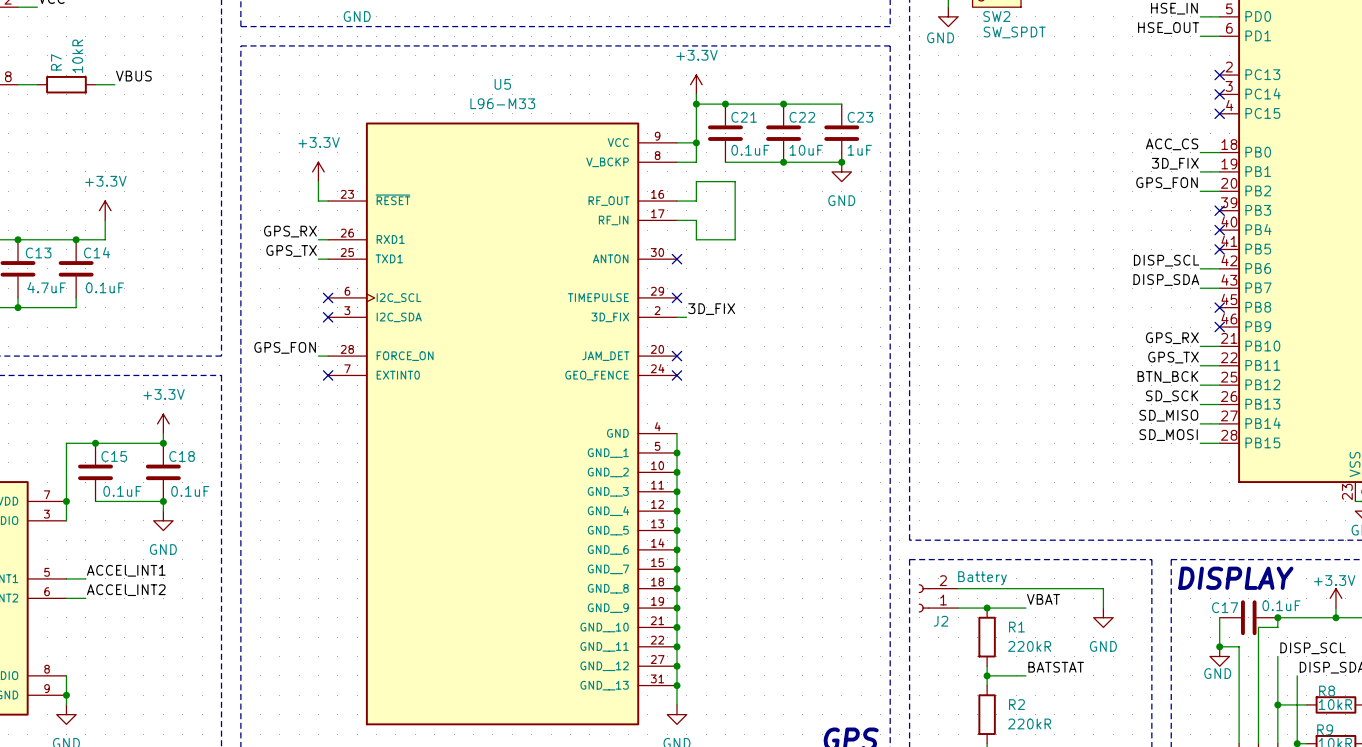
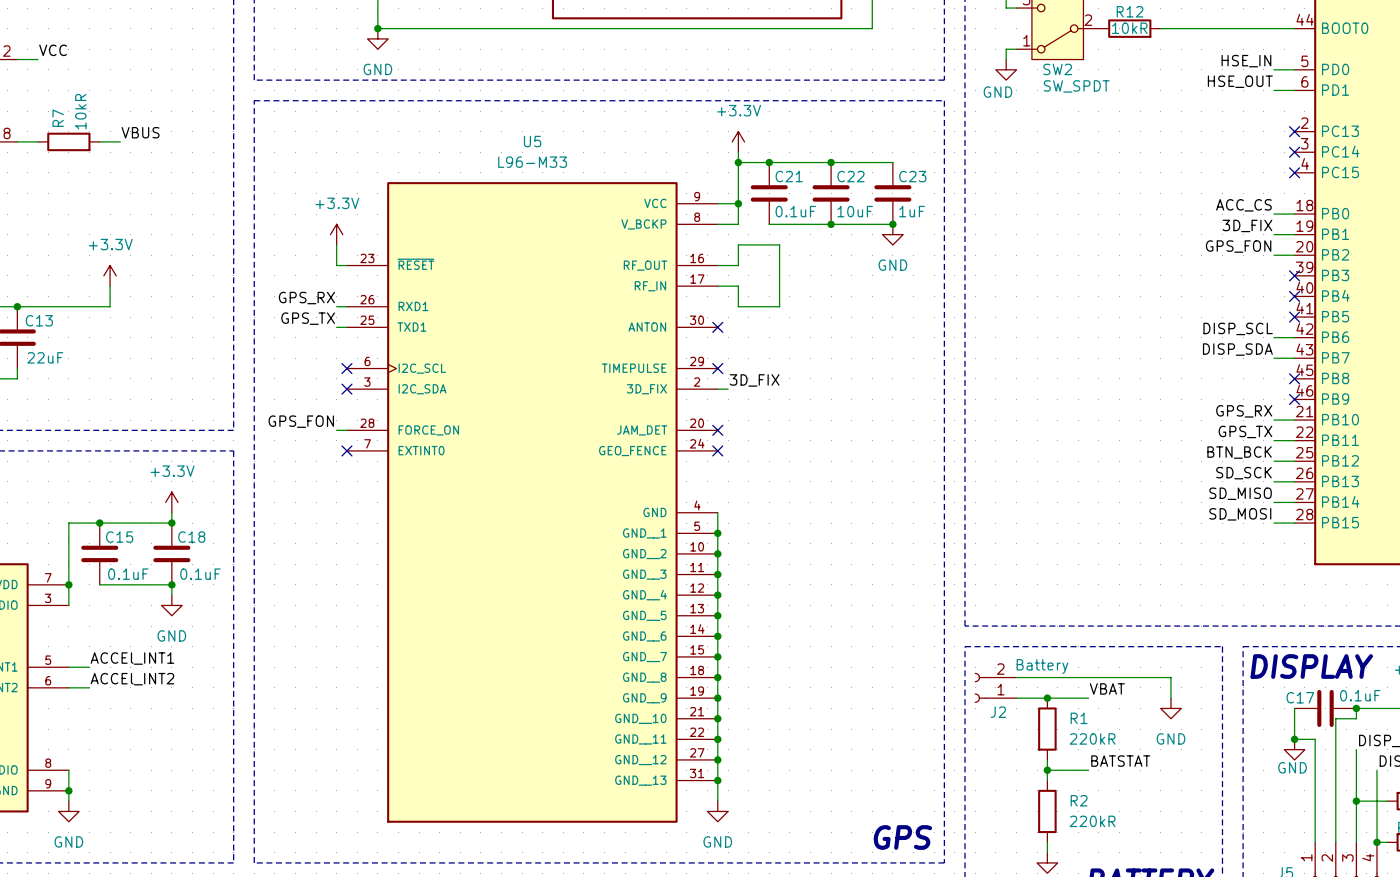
junction: (76, 239) -> none
C14: 0.1uF (76, 268) -> none
C13 value: 4.7uF (46, 287) -> 22uF (45, 357)
wire: (76, 297) (76, 307) (17, 307) -> none
junction: (17, 307) -> none

